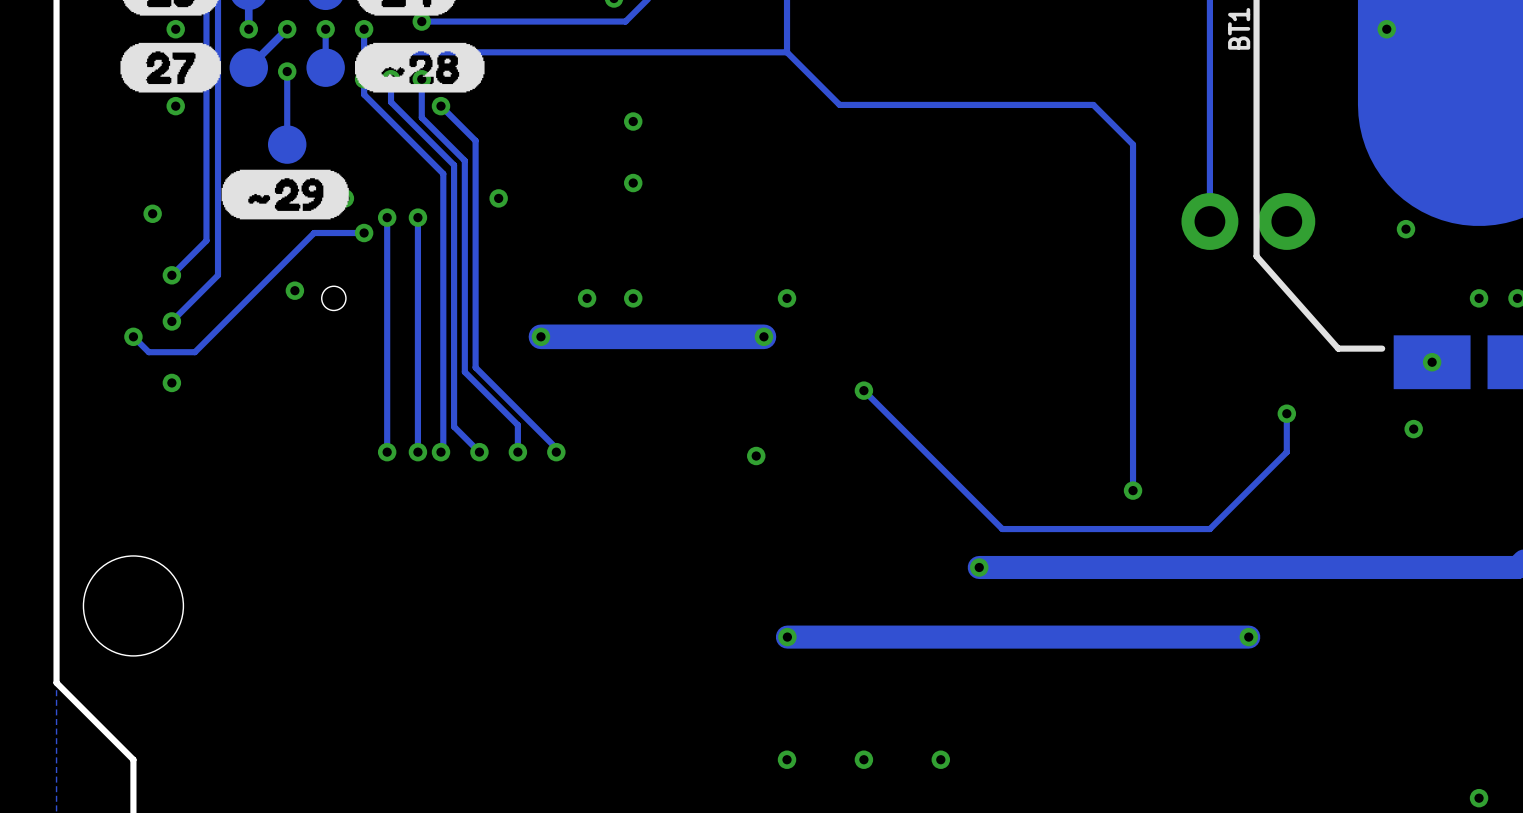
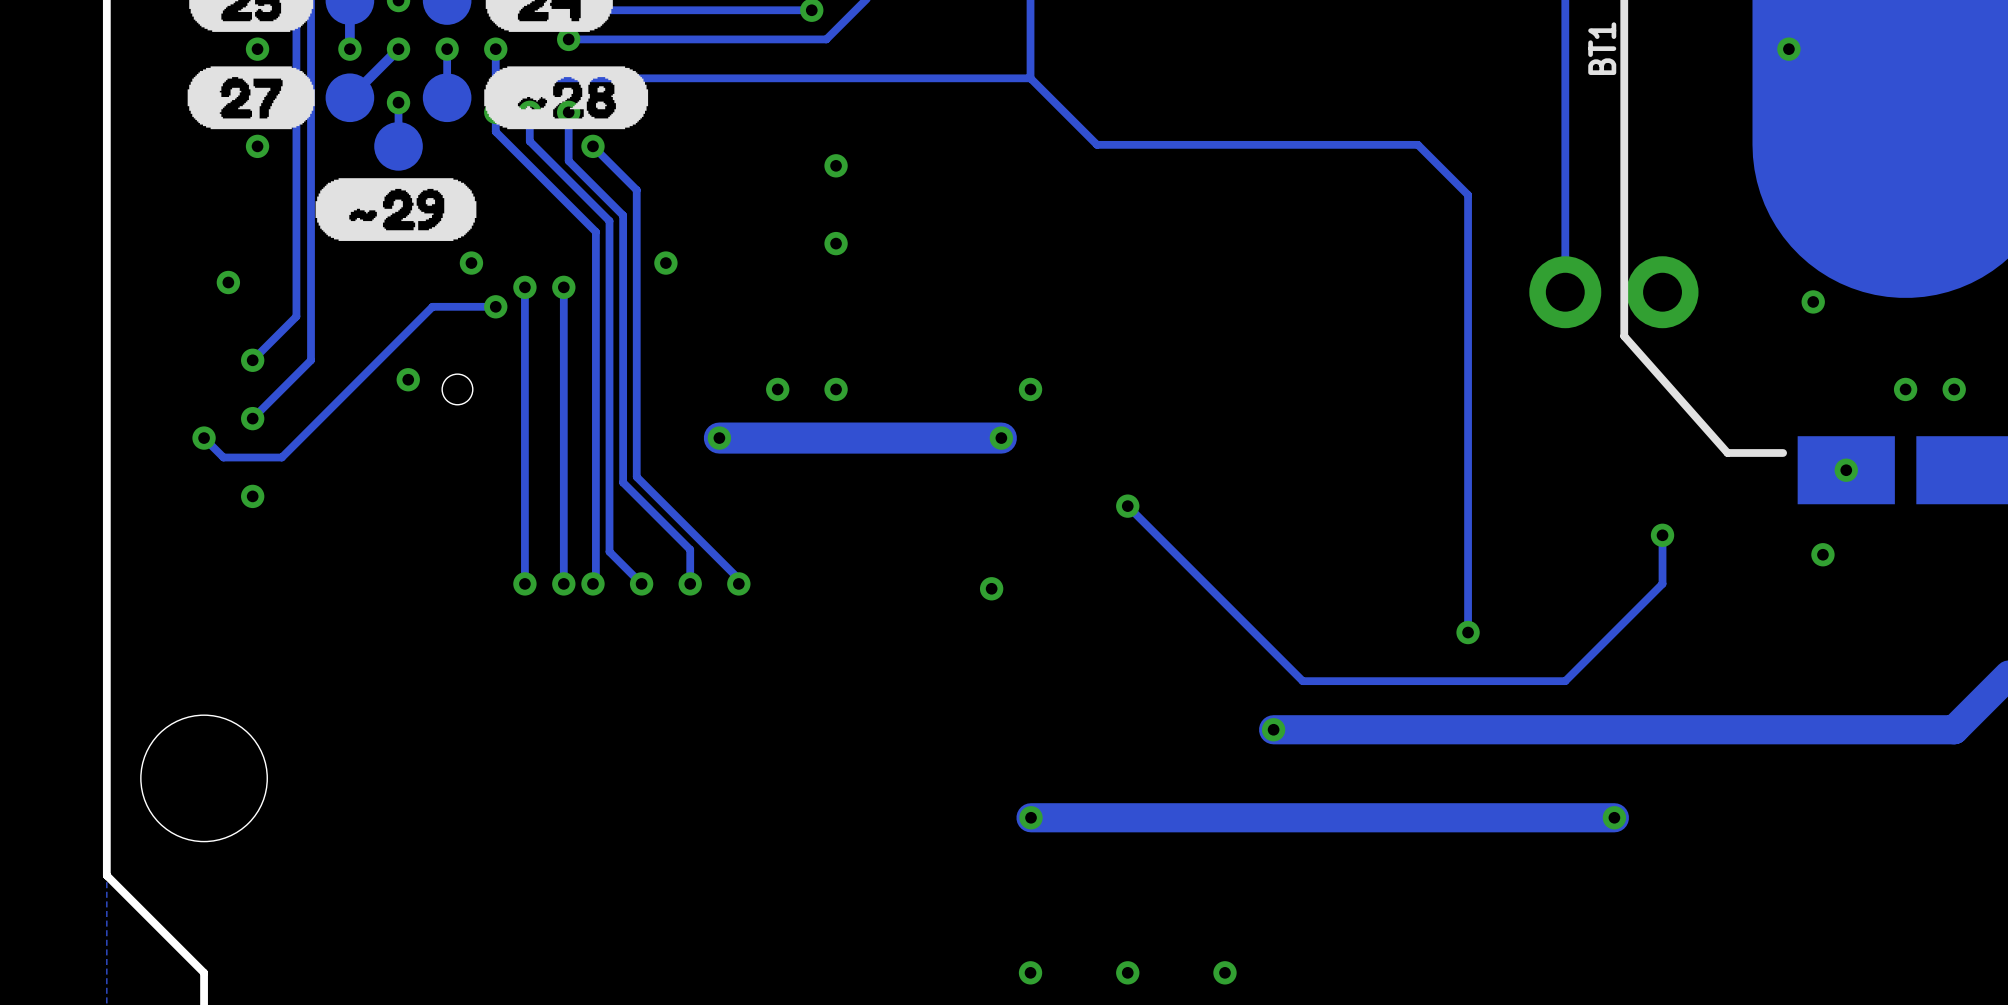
track: (287, 106) (287, 144) -> none
part position: (287, 144) -> (398, 146)
drawing position: (285, 194) -> (396, 209)

